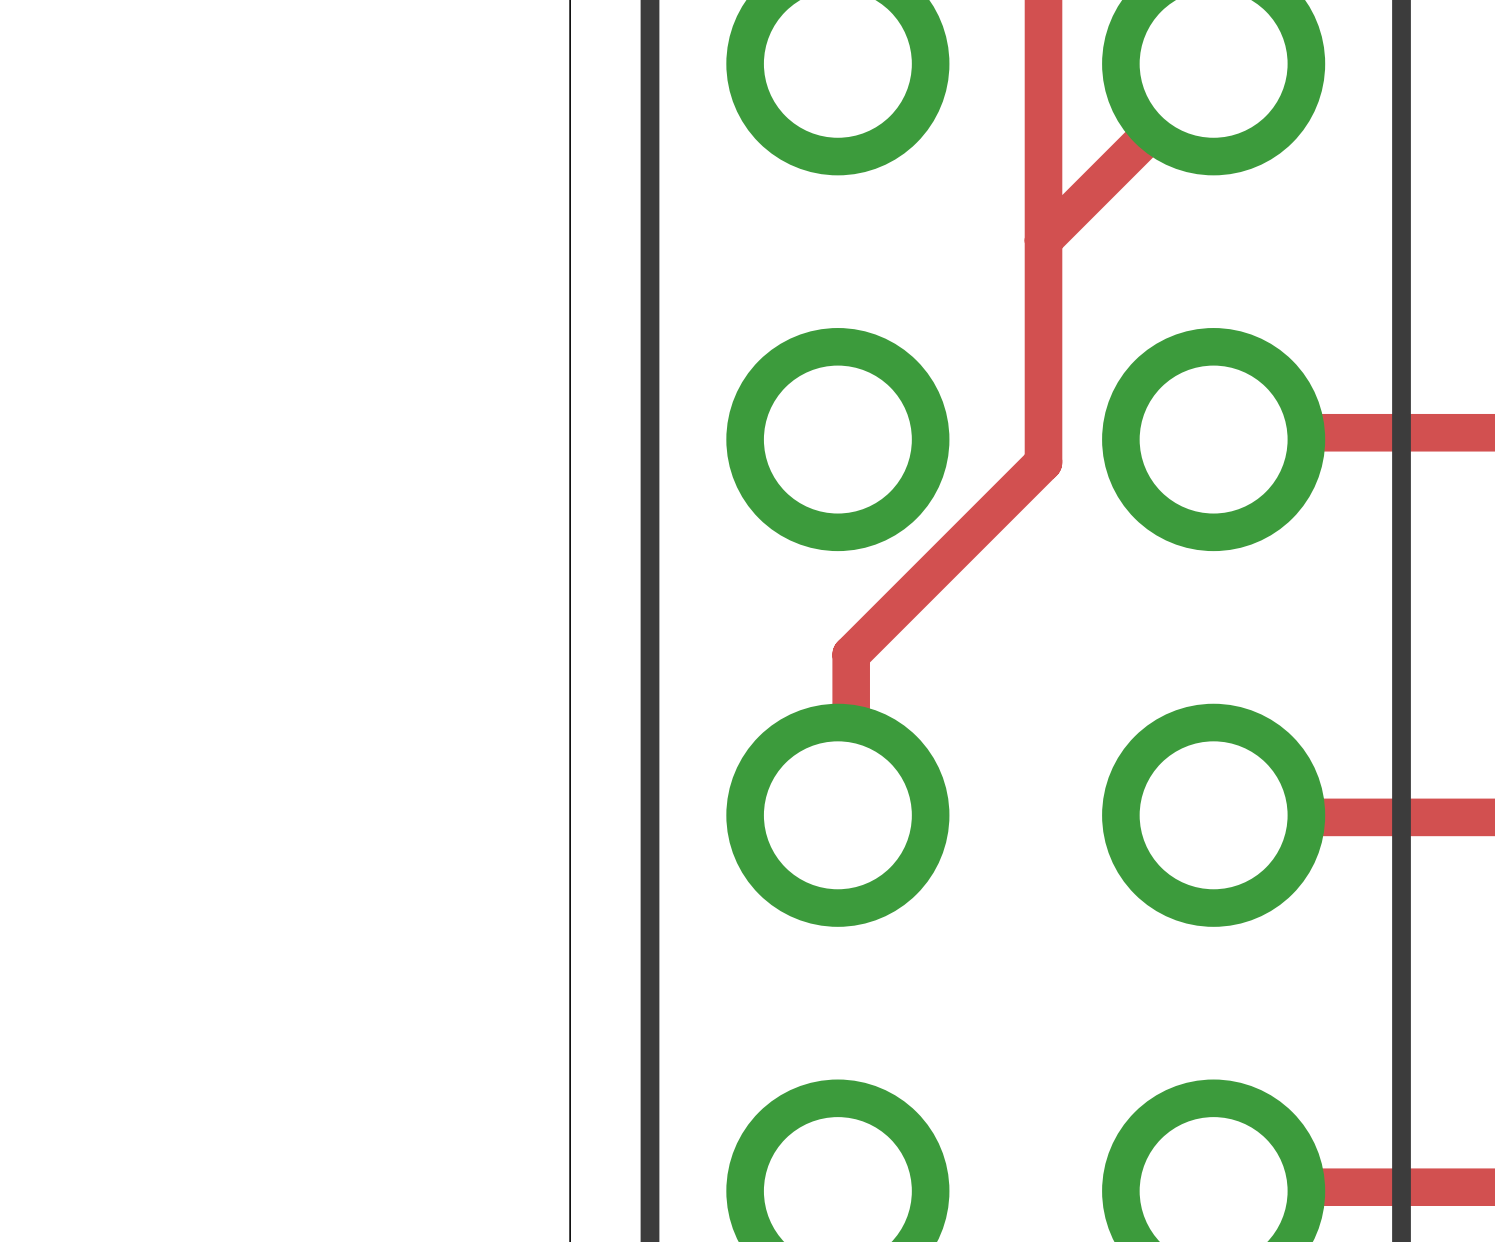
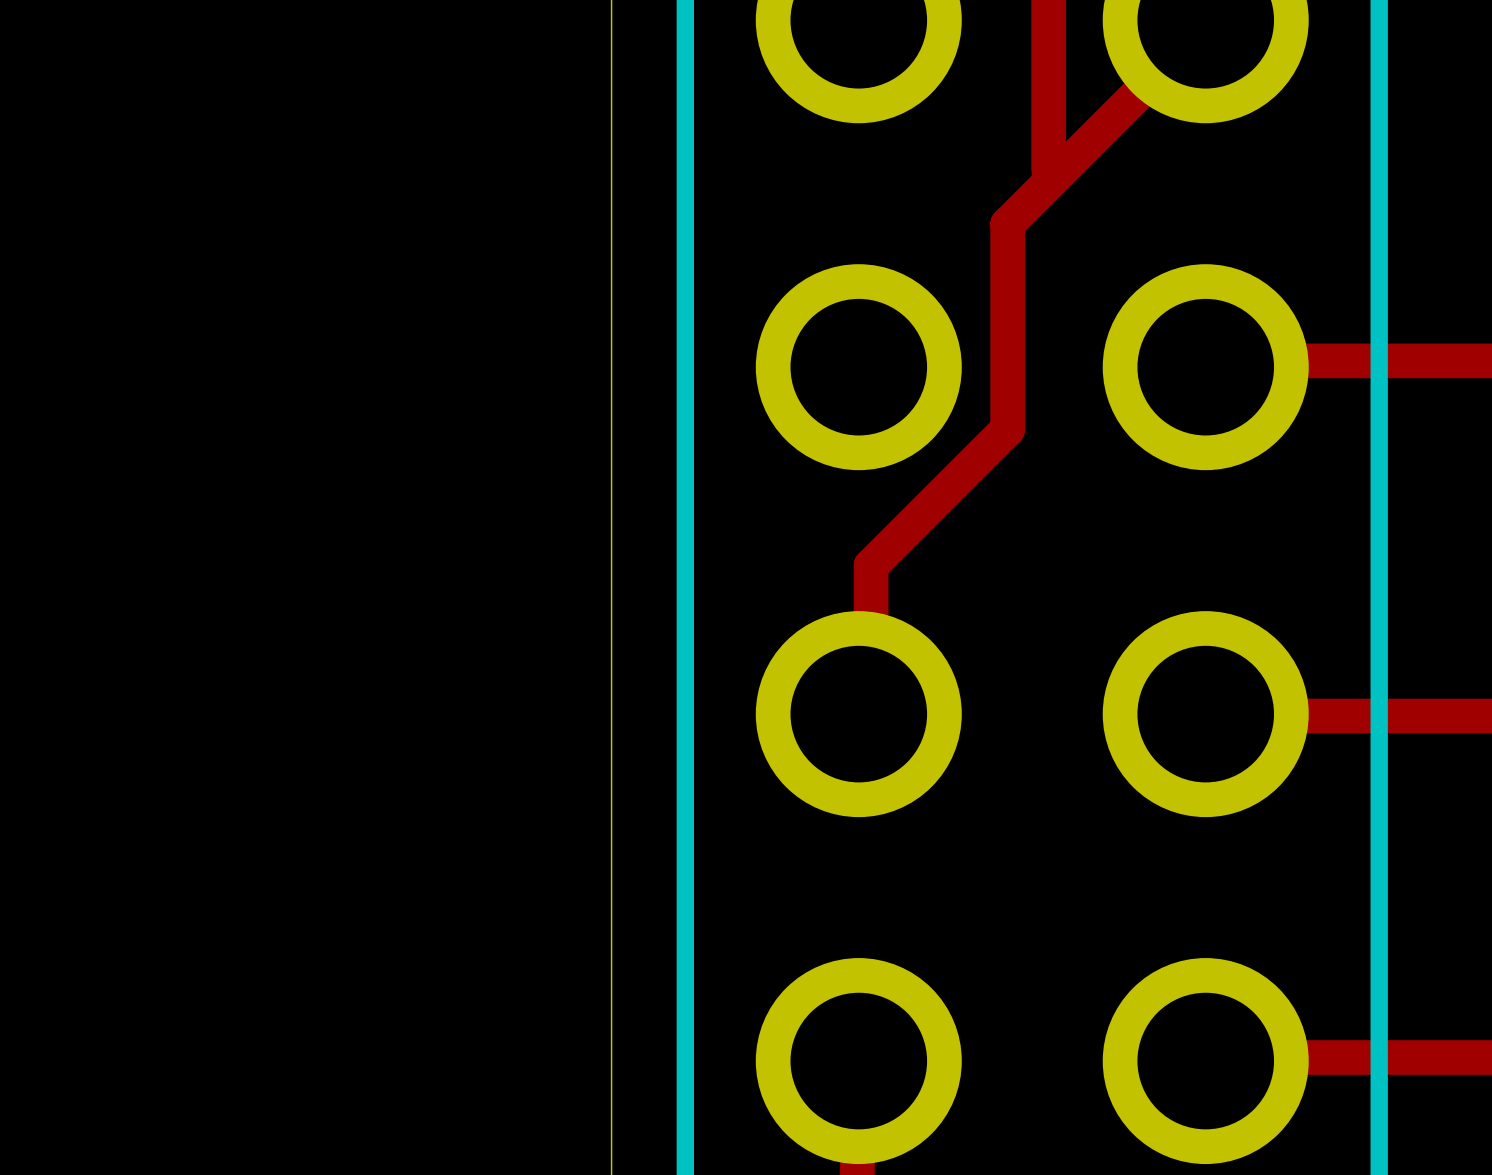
top track: (1043, 225) (1043, 462) (999, 506) -> (1048, 183) (1007, 224) (1007, 429)

